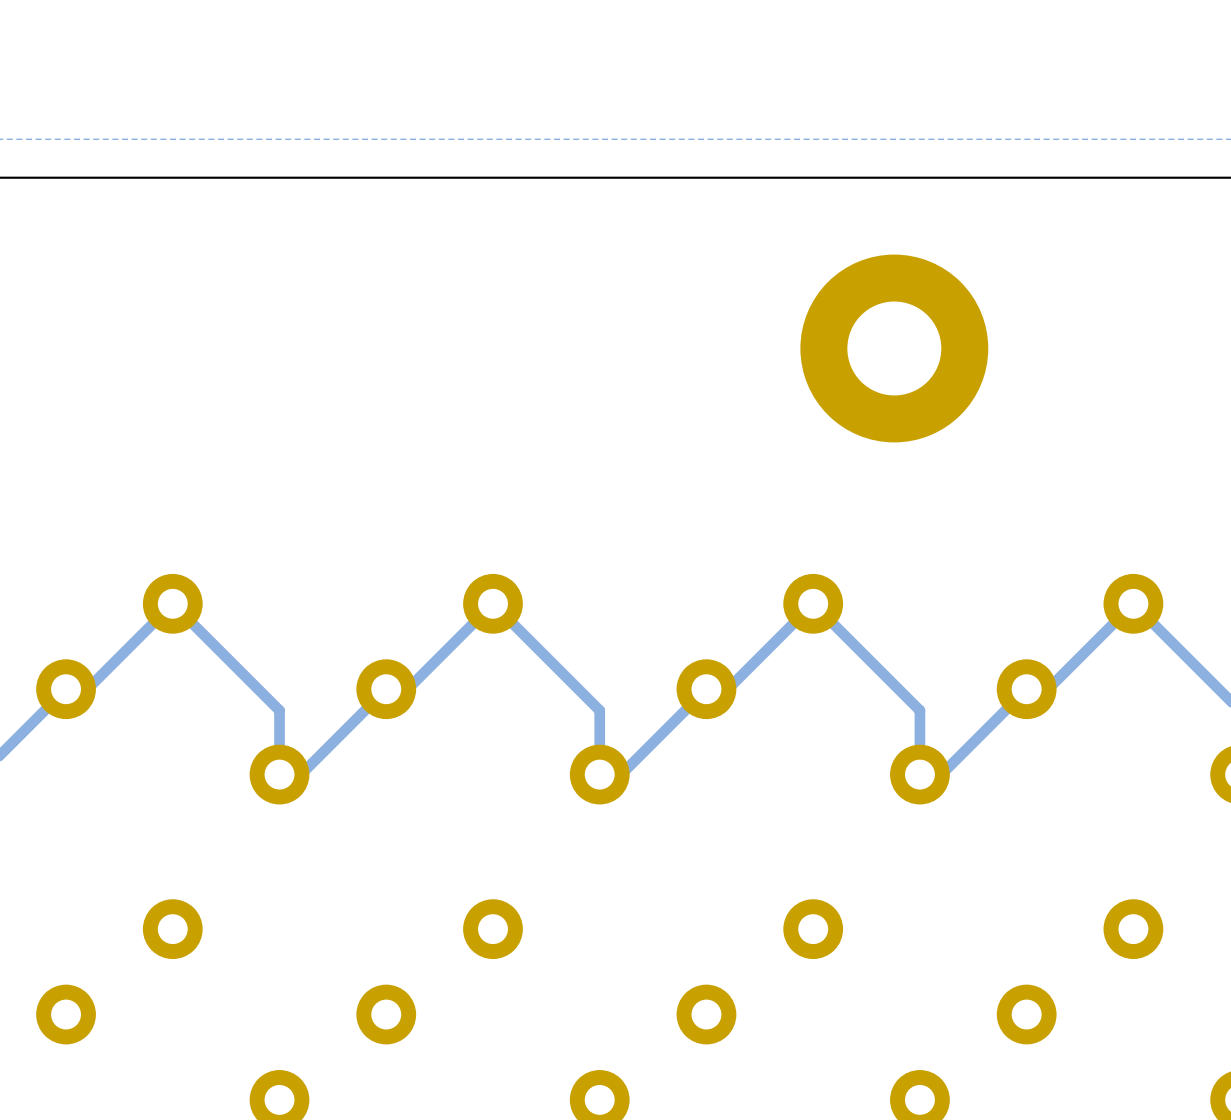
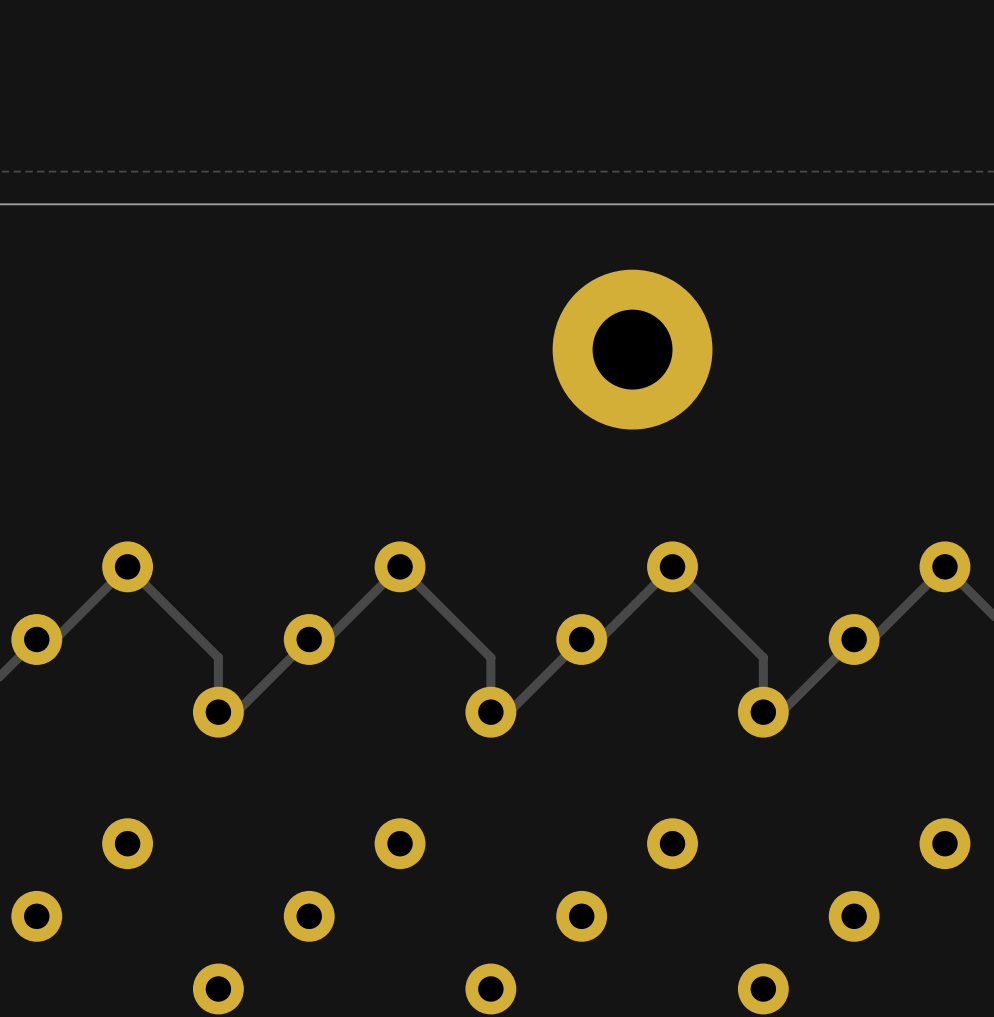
part position: (894, 348) -> (632, 349)

